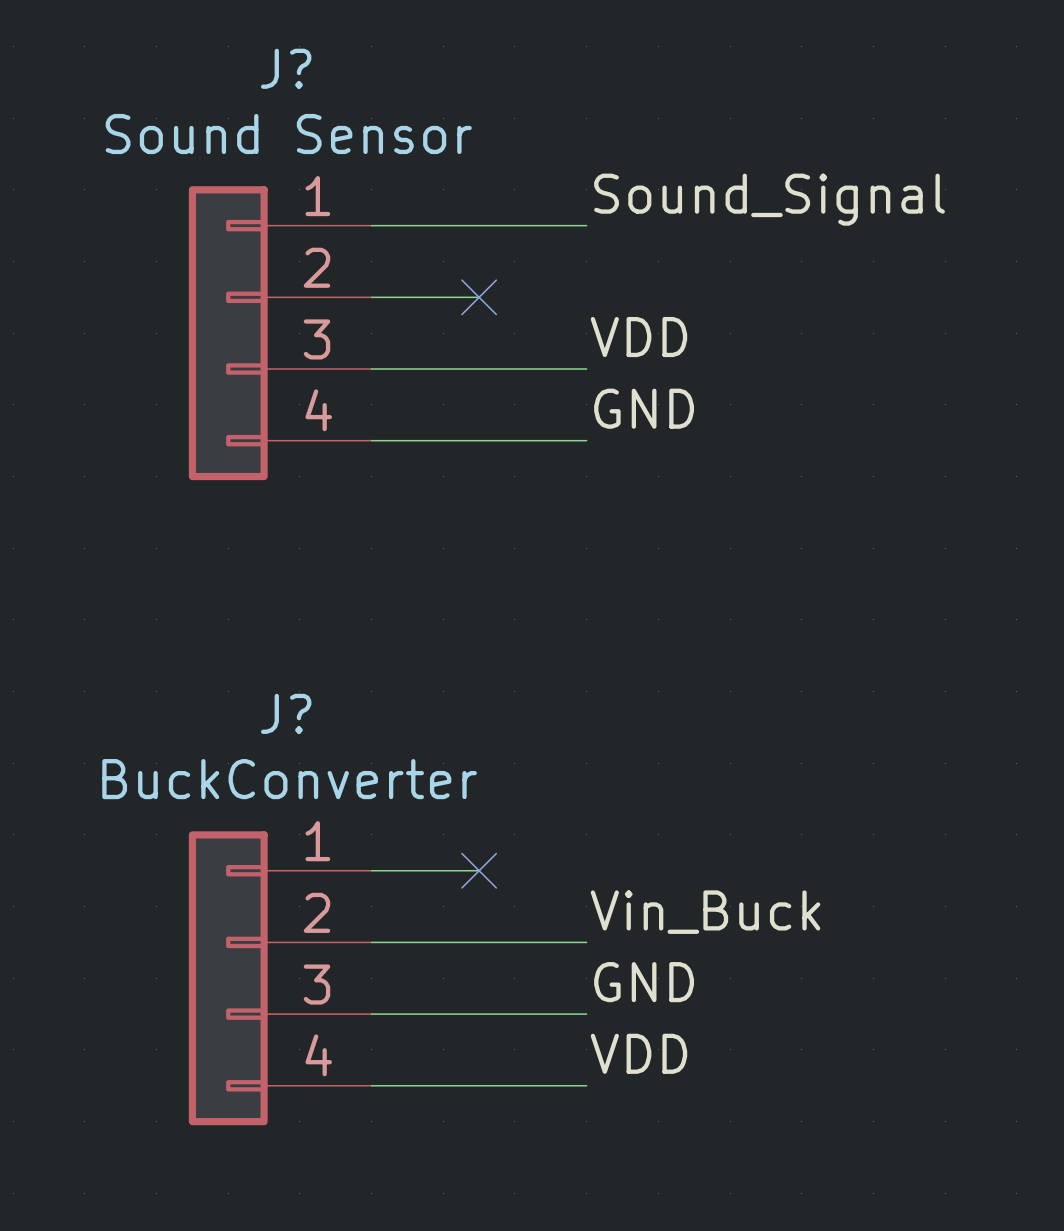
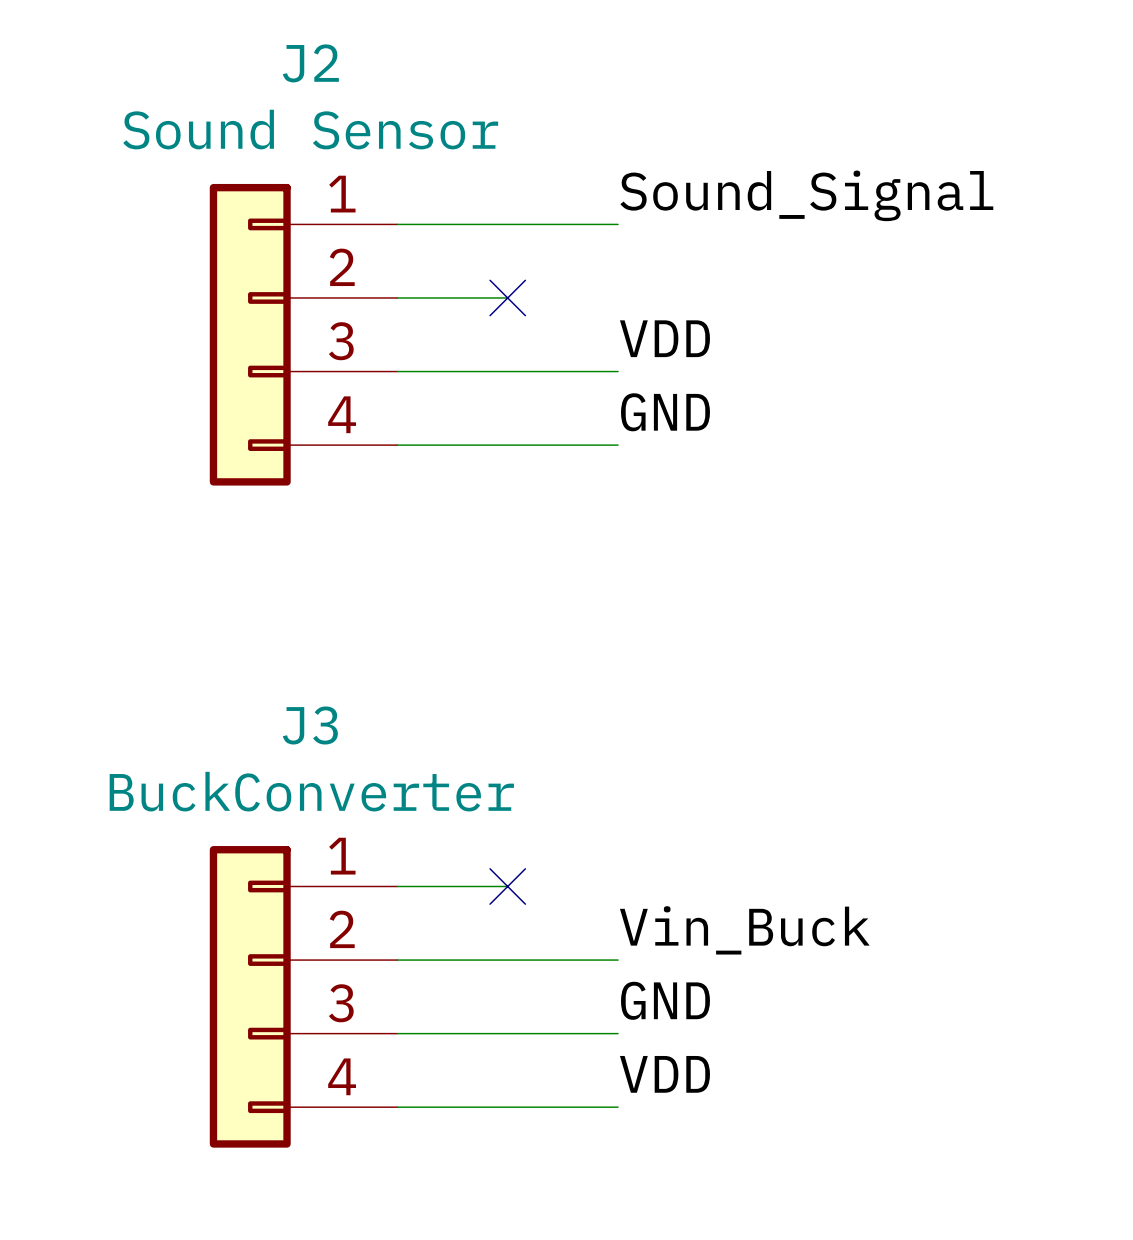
J? name: J? (286, 68) -> J2 (310, 63)
J? name: J? (286, 713) -> J3 (310, 725)

